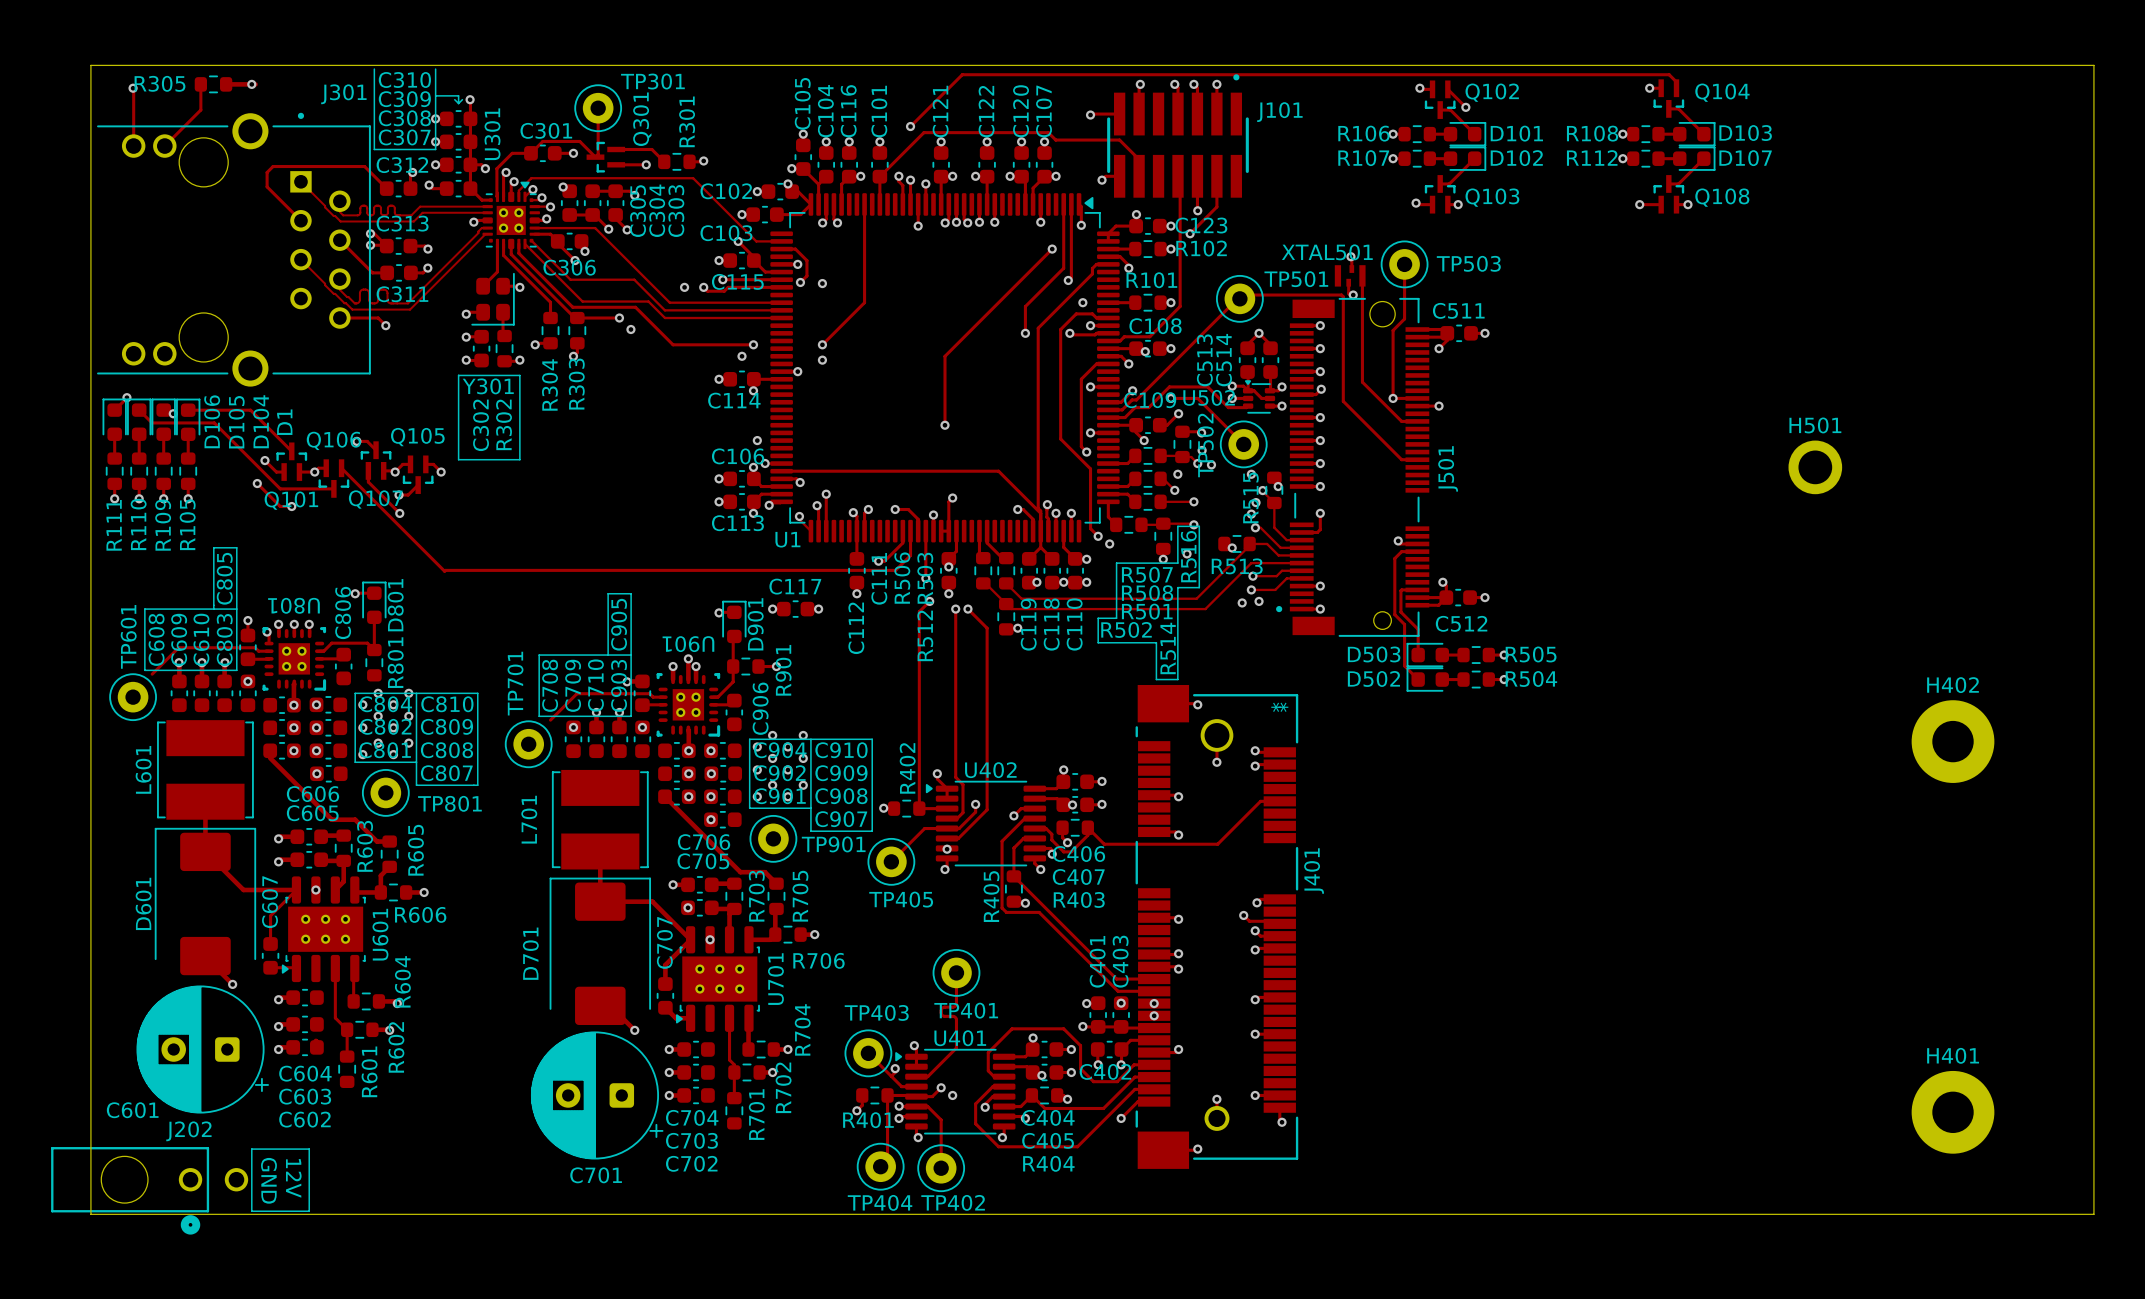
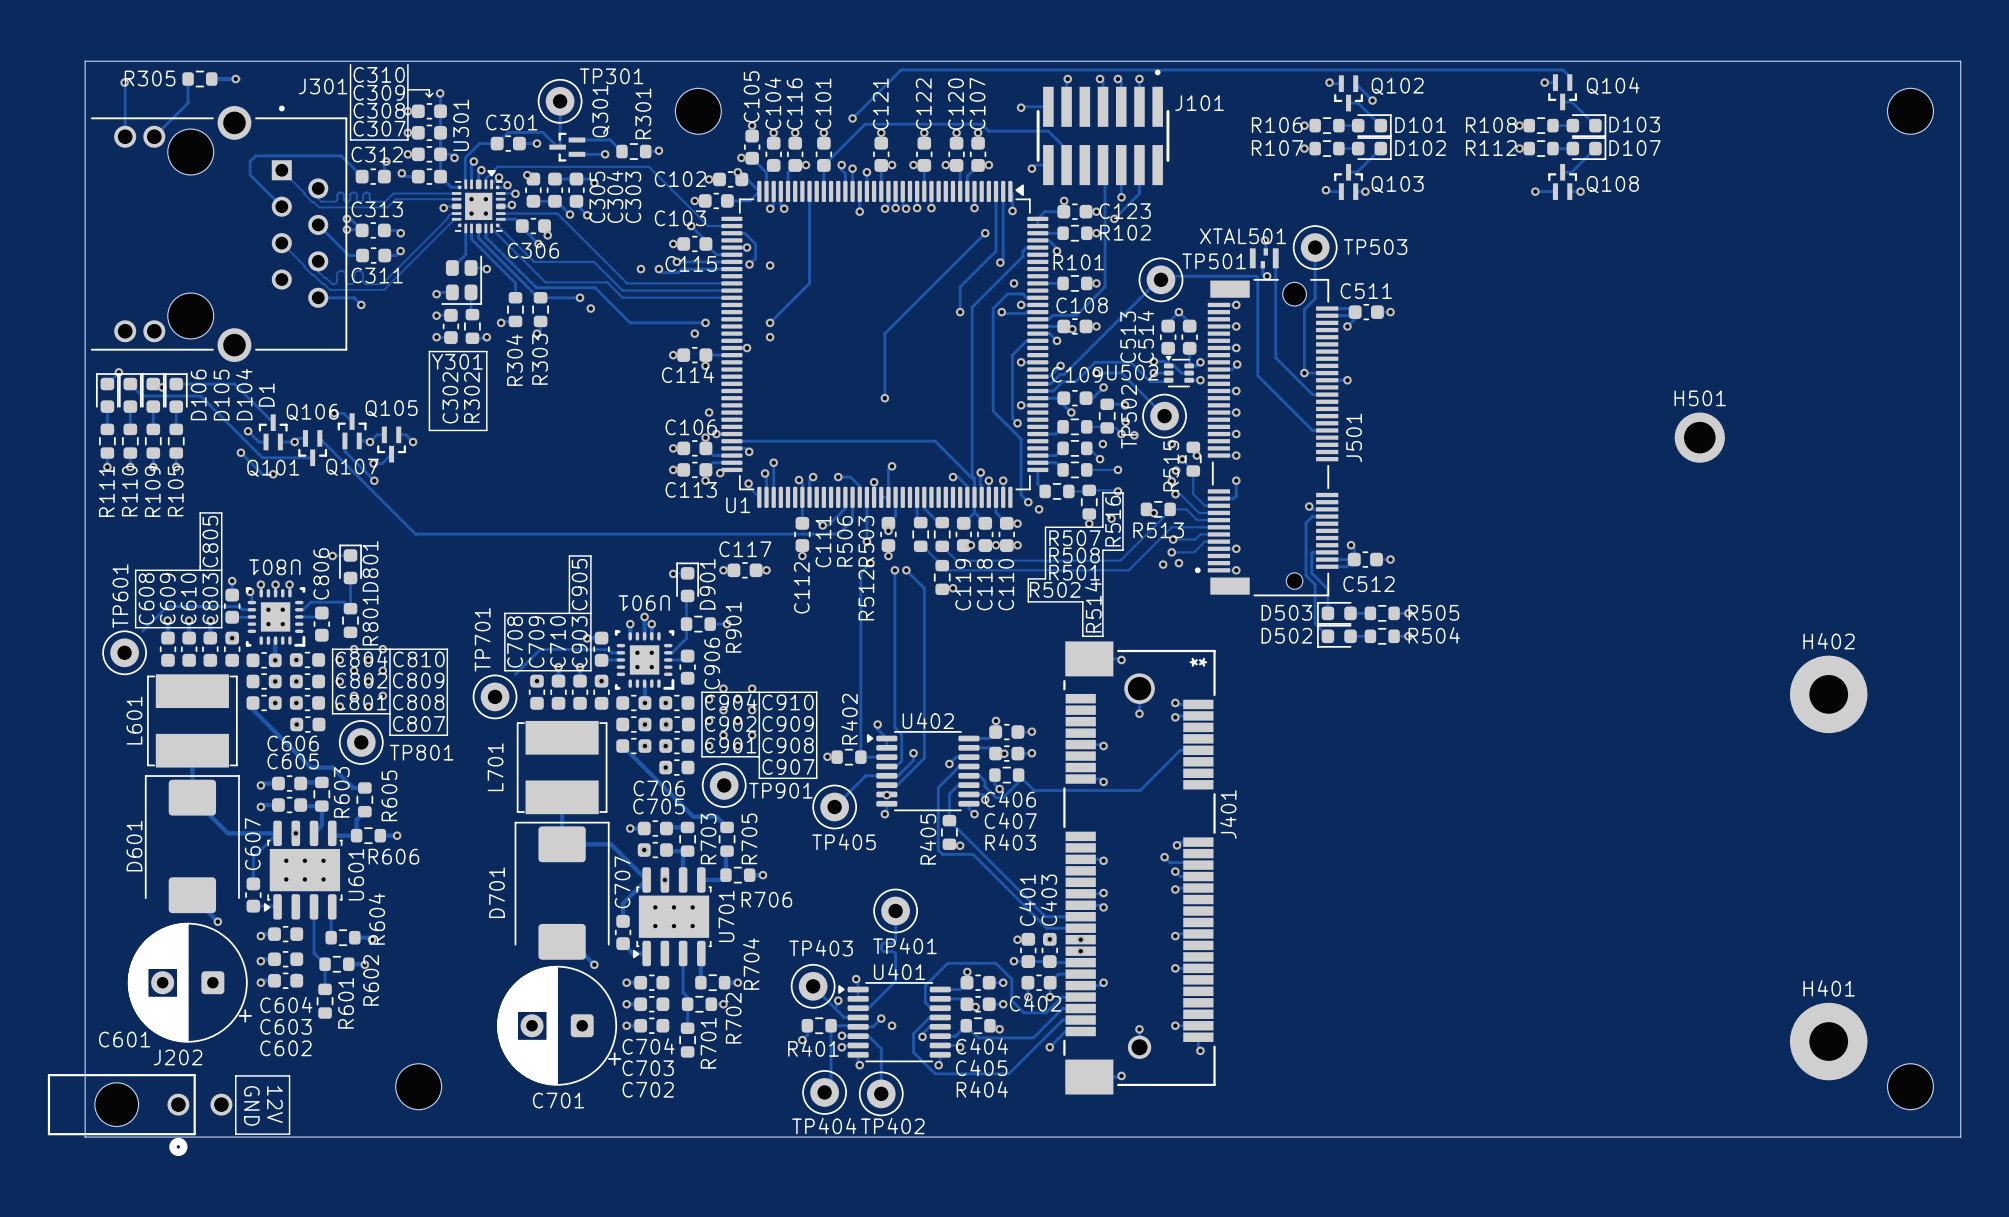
part: none -> (698, 111)
part: none -> (1910, 111)
part: none -> (418, 1086)
part: none -> (1910, 1086)

